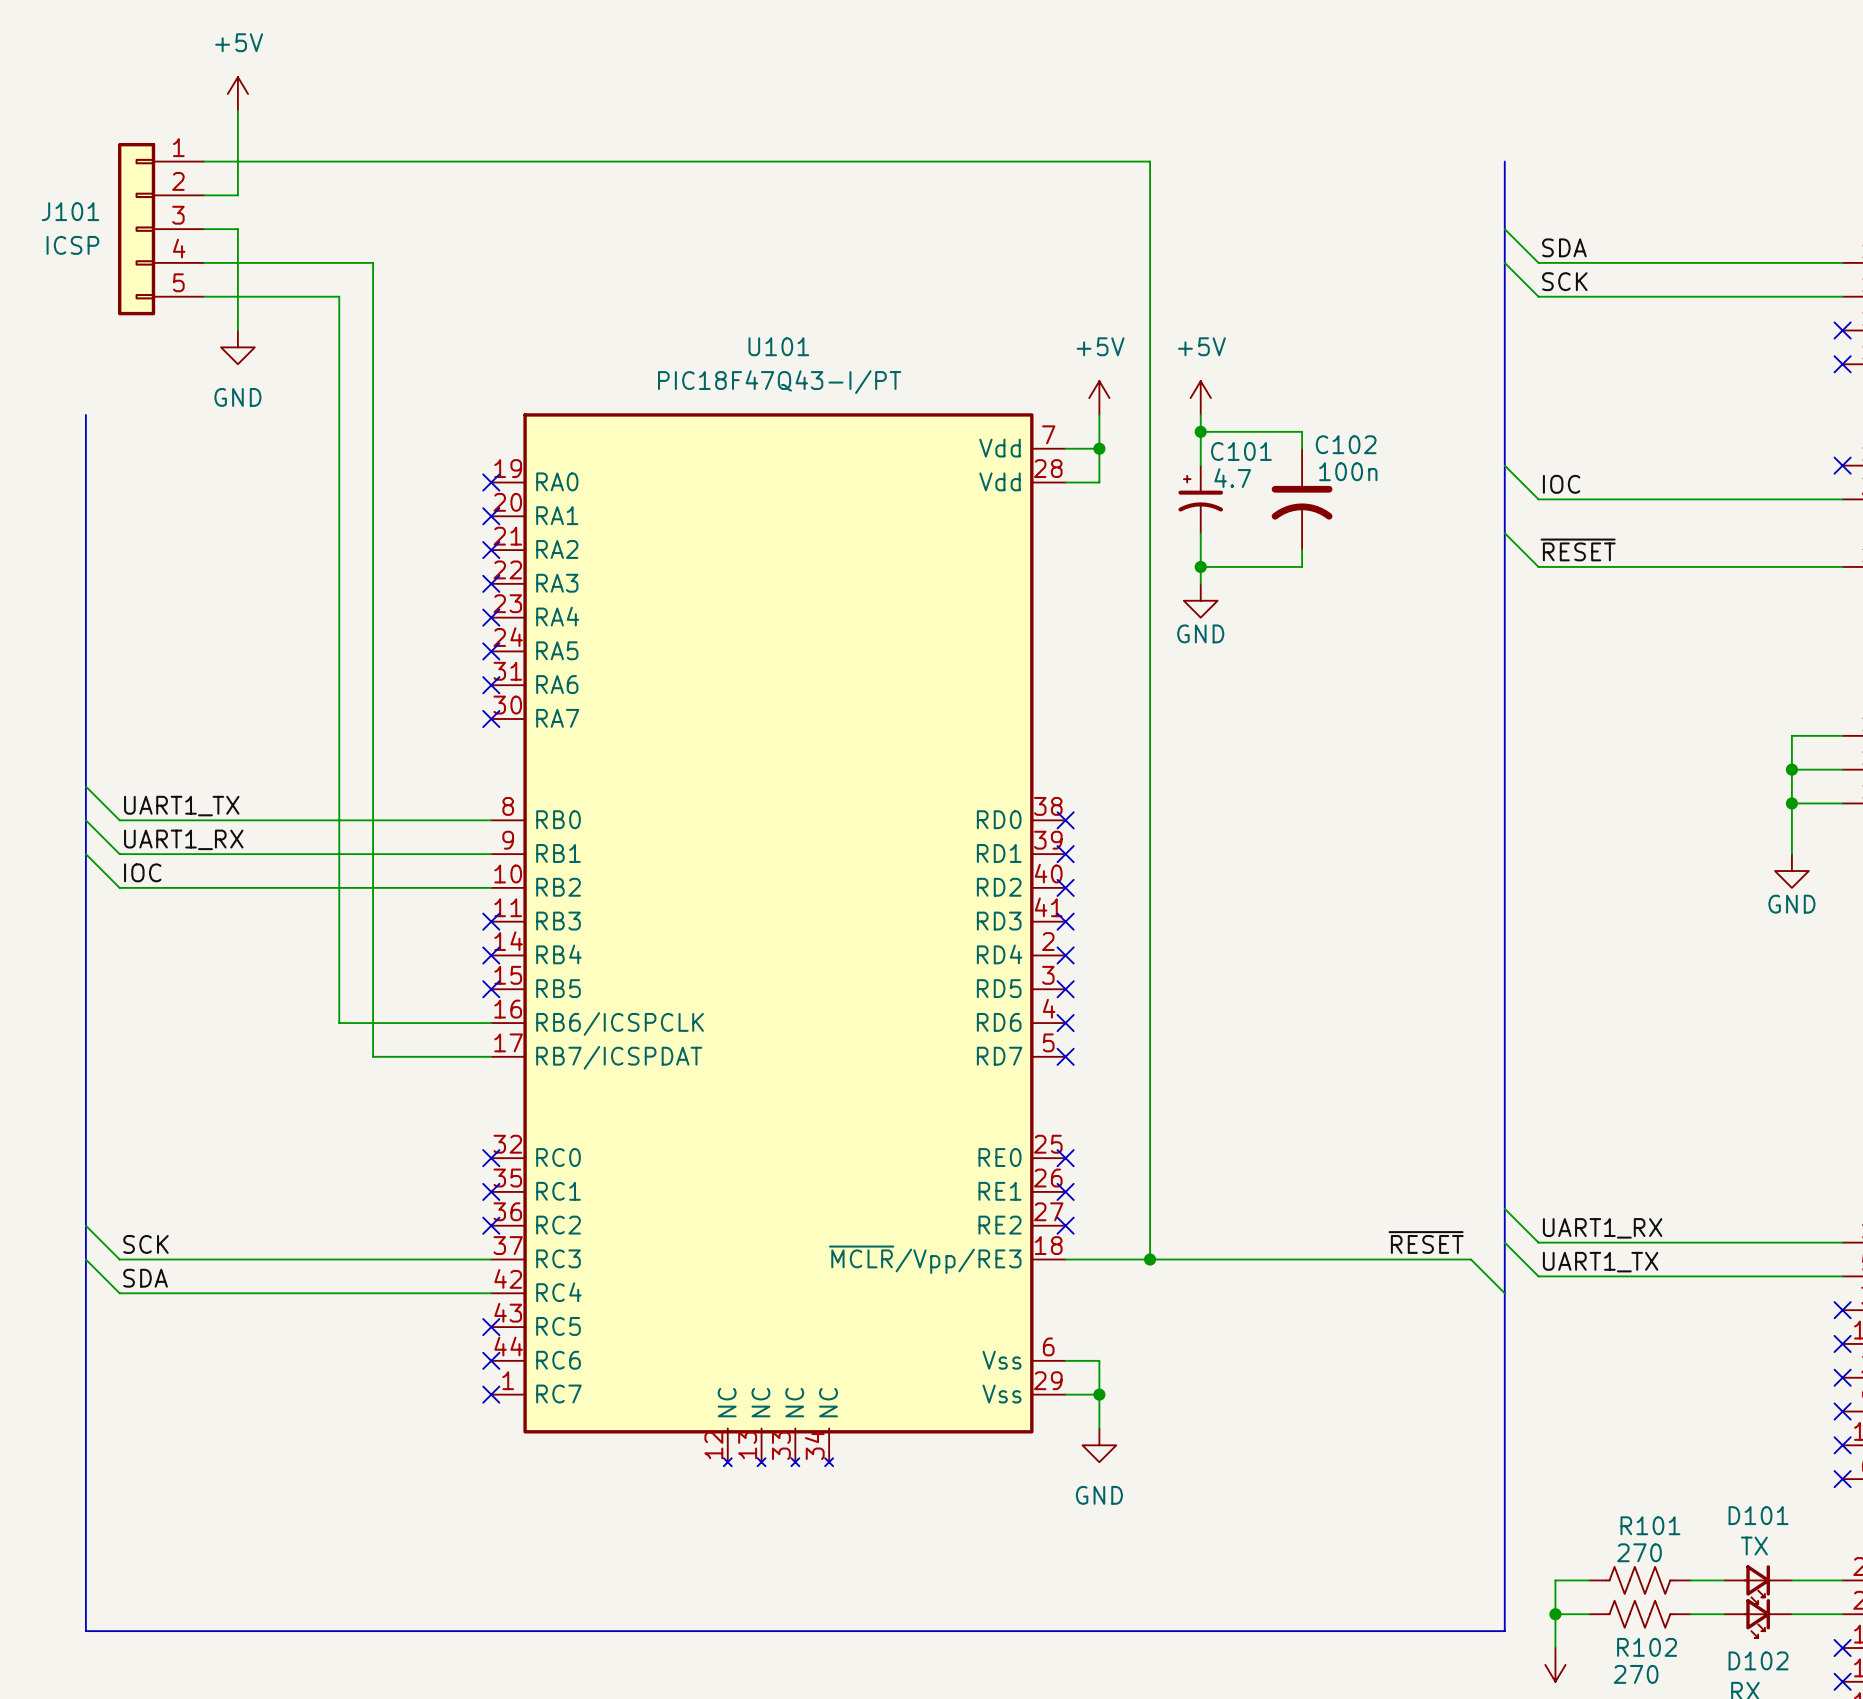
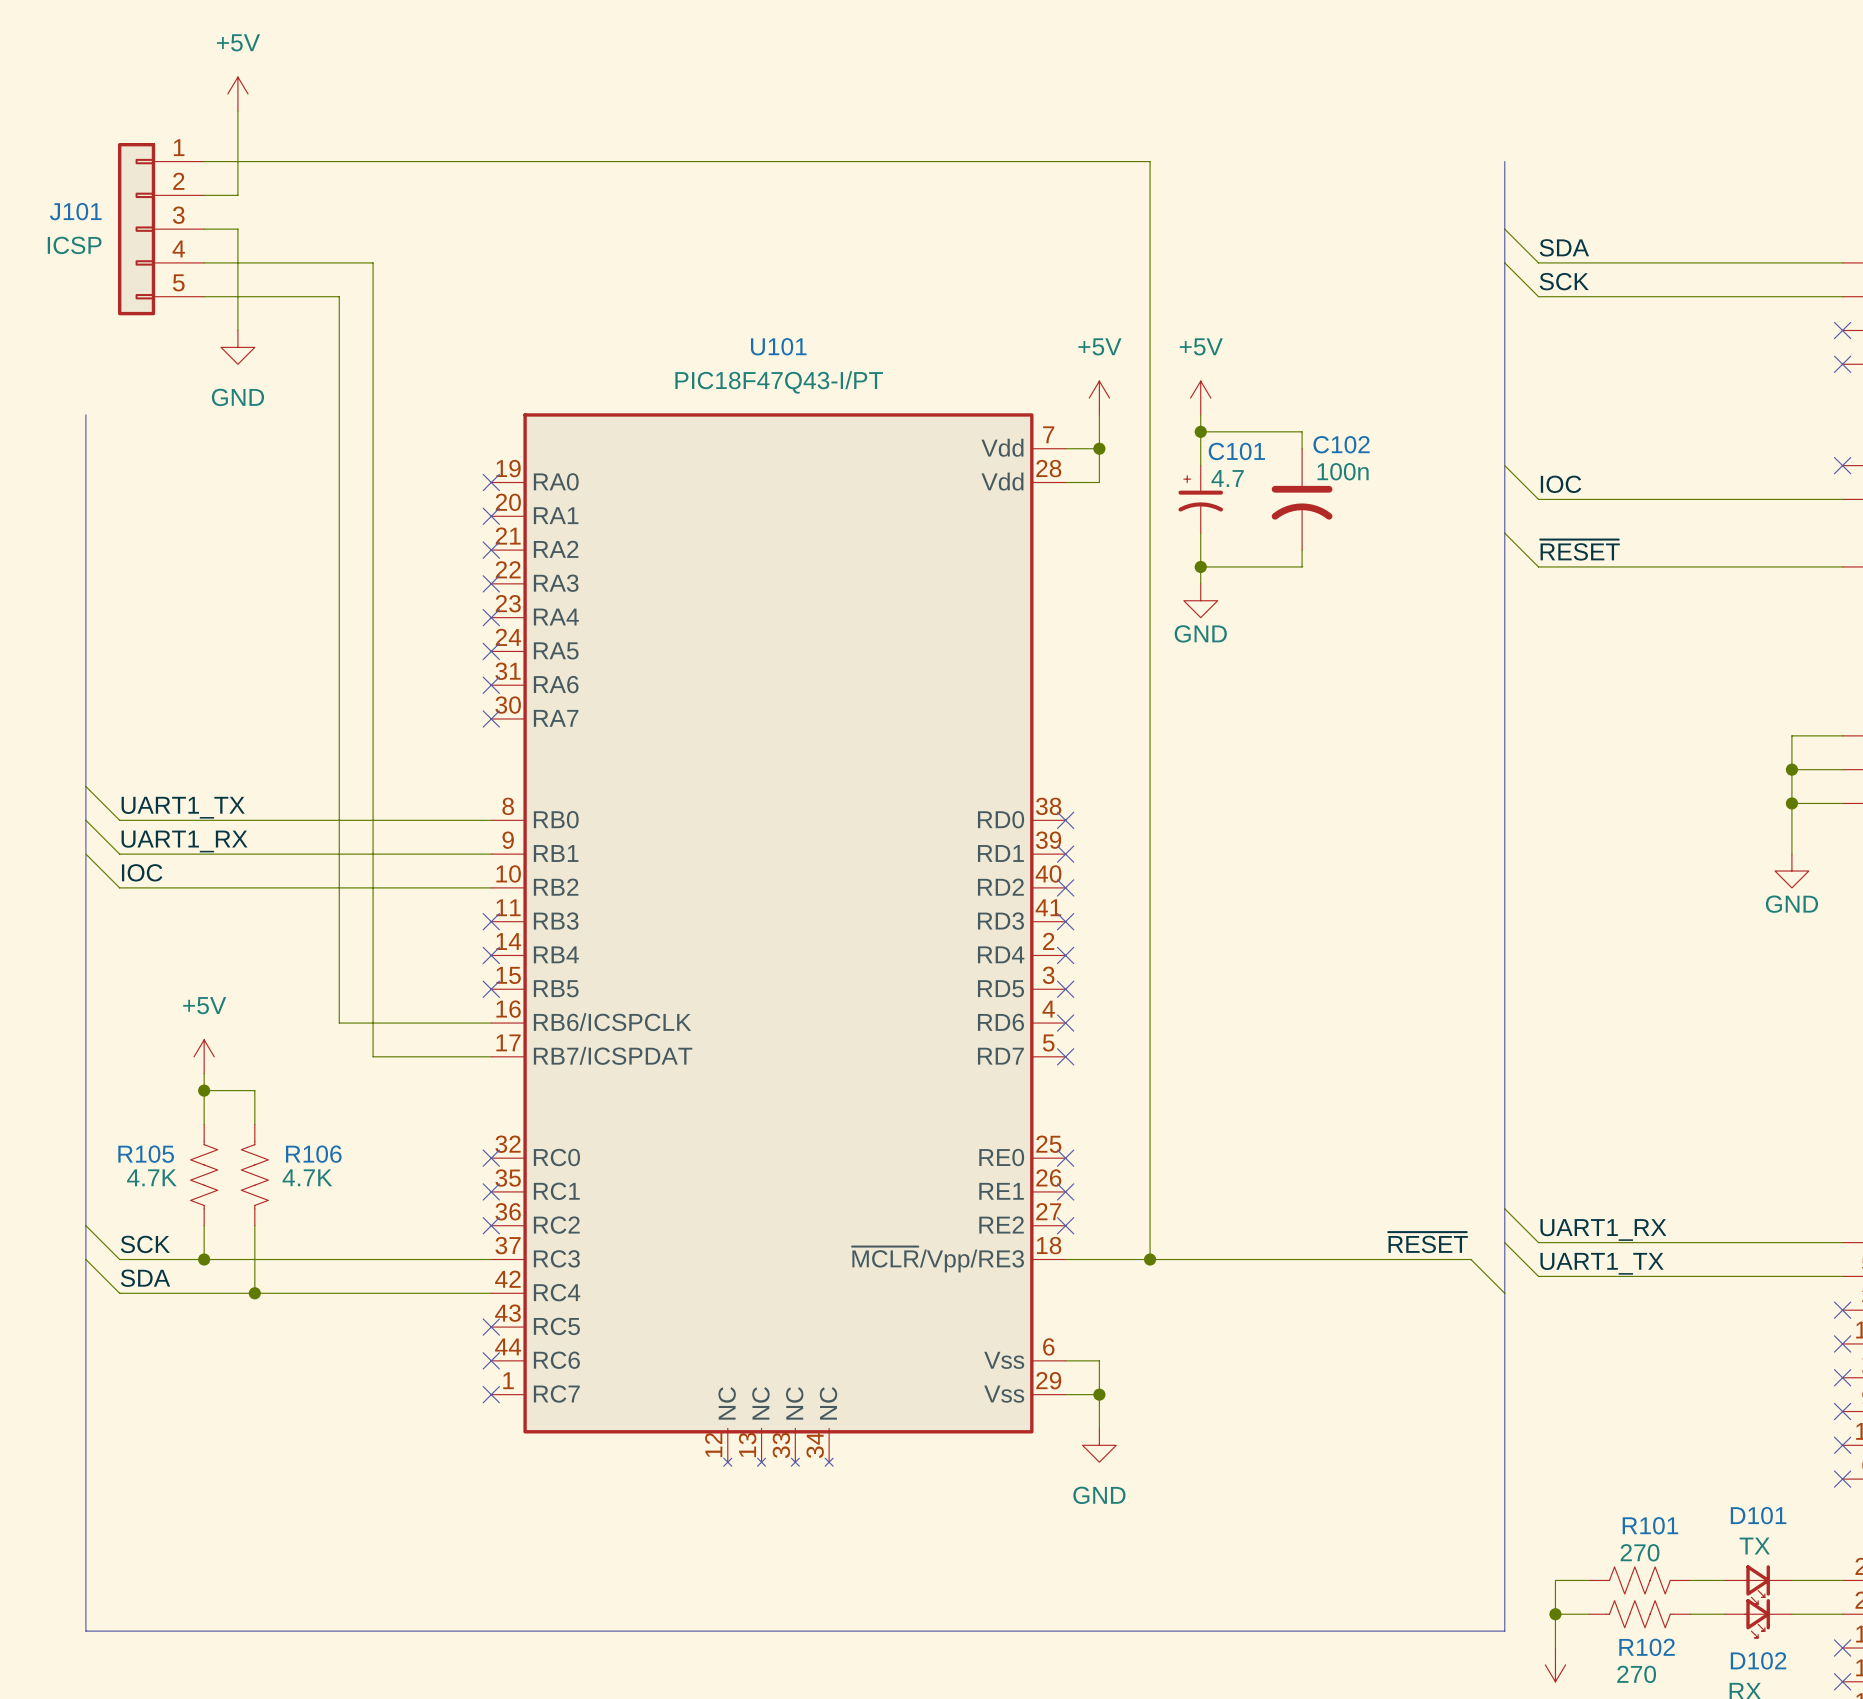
power symbol: none -> +5V (204, 1056)
wire: none -> (204, 1073) (204, 1124)
wire: none -> (204, 1090) (254, 1090) (254, 1124)
junction: none -> (204, 1090)
R105: none -> 4.7K (204, 1175)
R106: none -> 4.7K (254, 1175)
wire: none -> (204, 1225) (204, 1259)
wire: none -> (254, 1225) (254, 1293)
junction: none -> (204, 1259)
junction: none -> (254, 1293)

